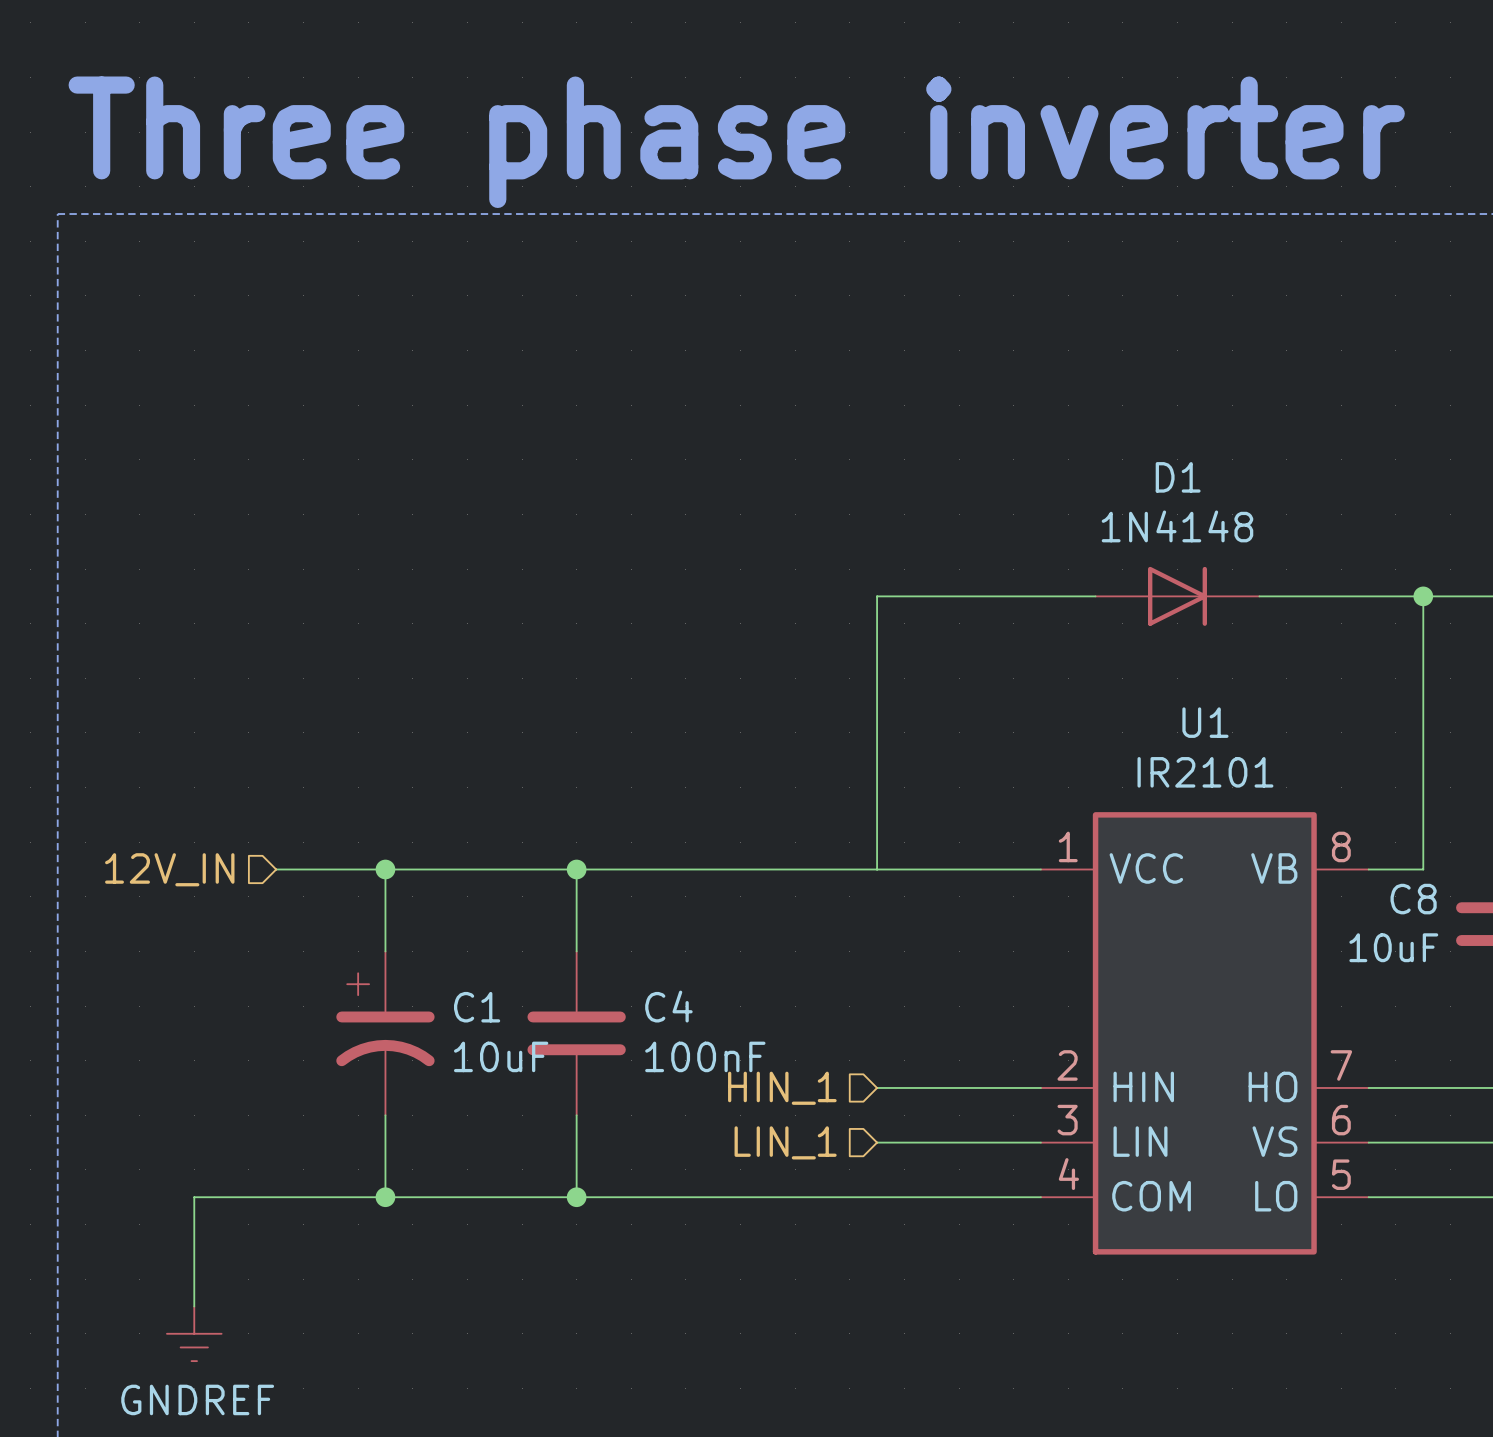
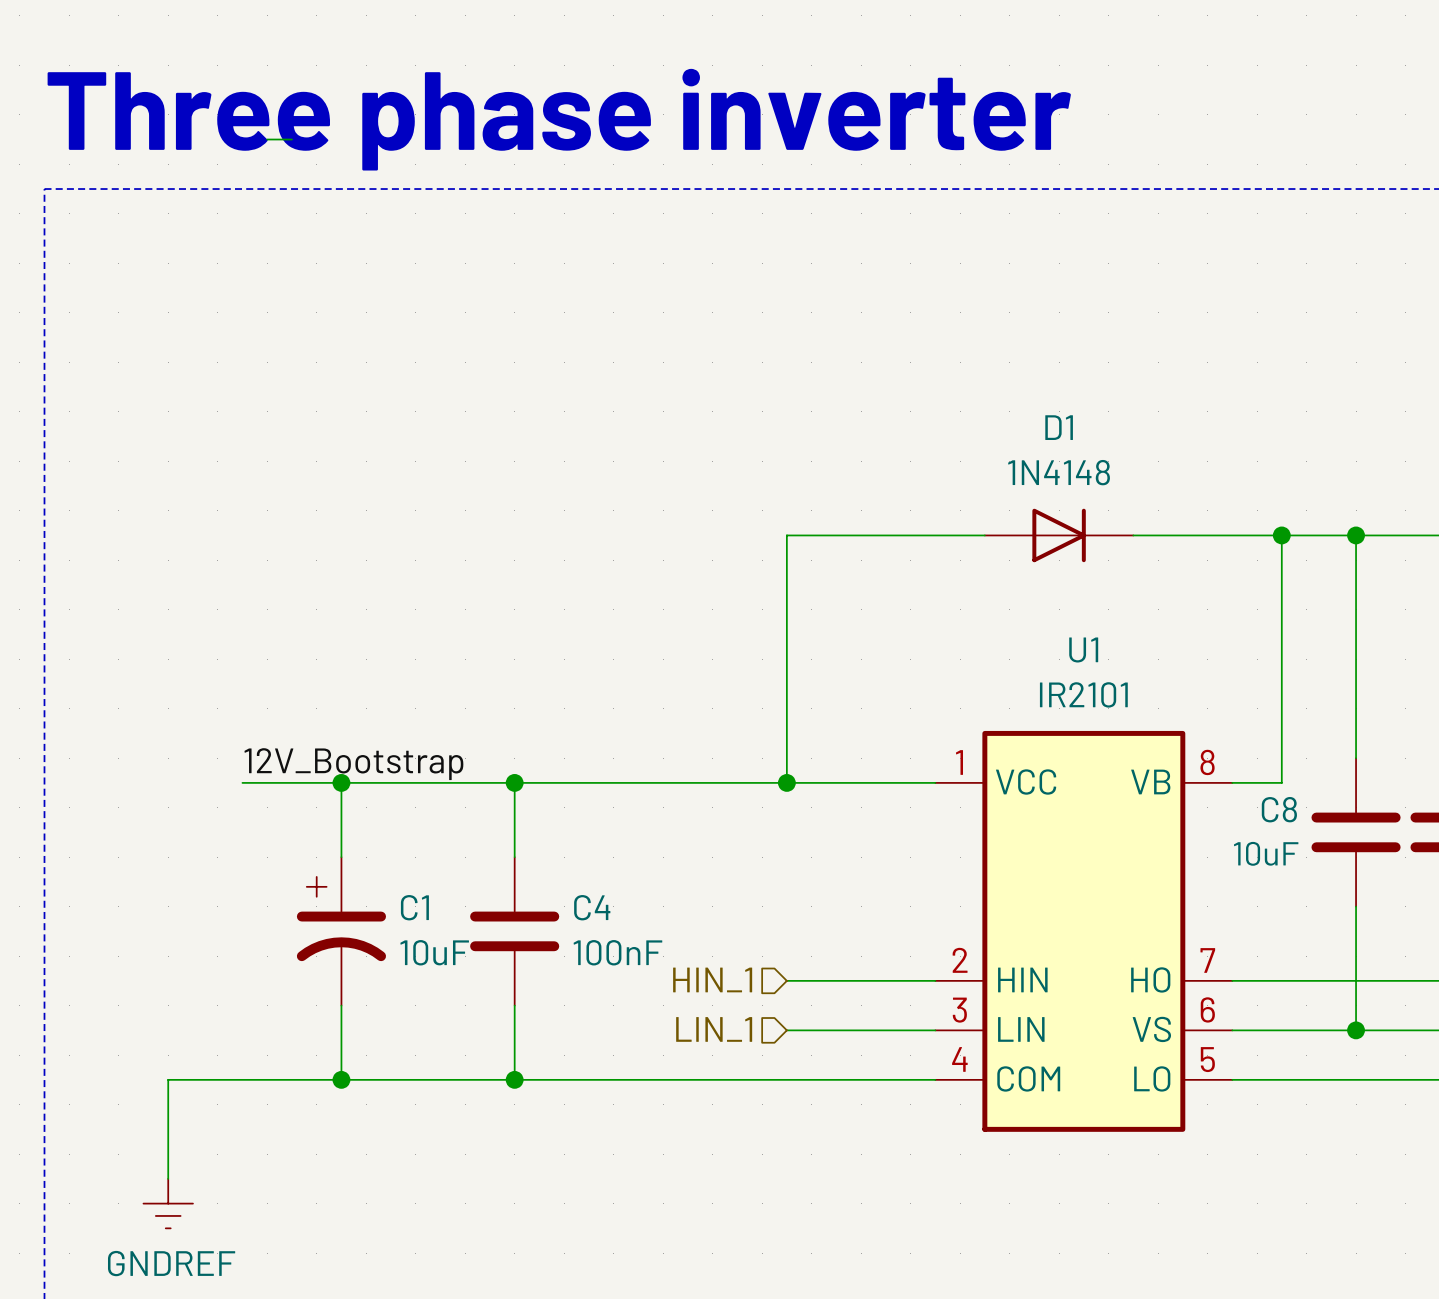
wire: none -> (267, 139) (291, 139)
label: none -> 12V_Bootstrap (353, 764)
hierarchical label: 12V_IN (169, 869) -> none
junction: none -> (786, 782)

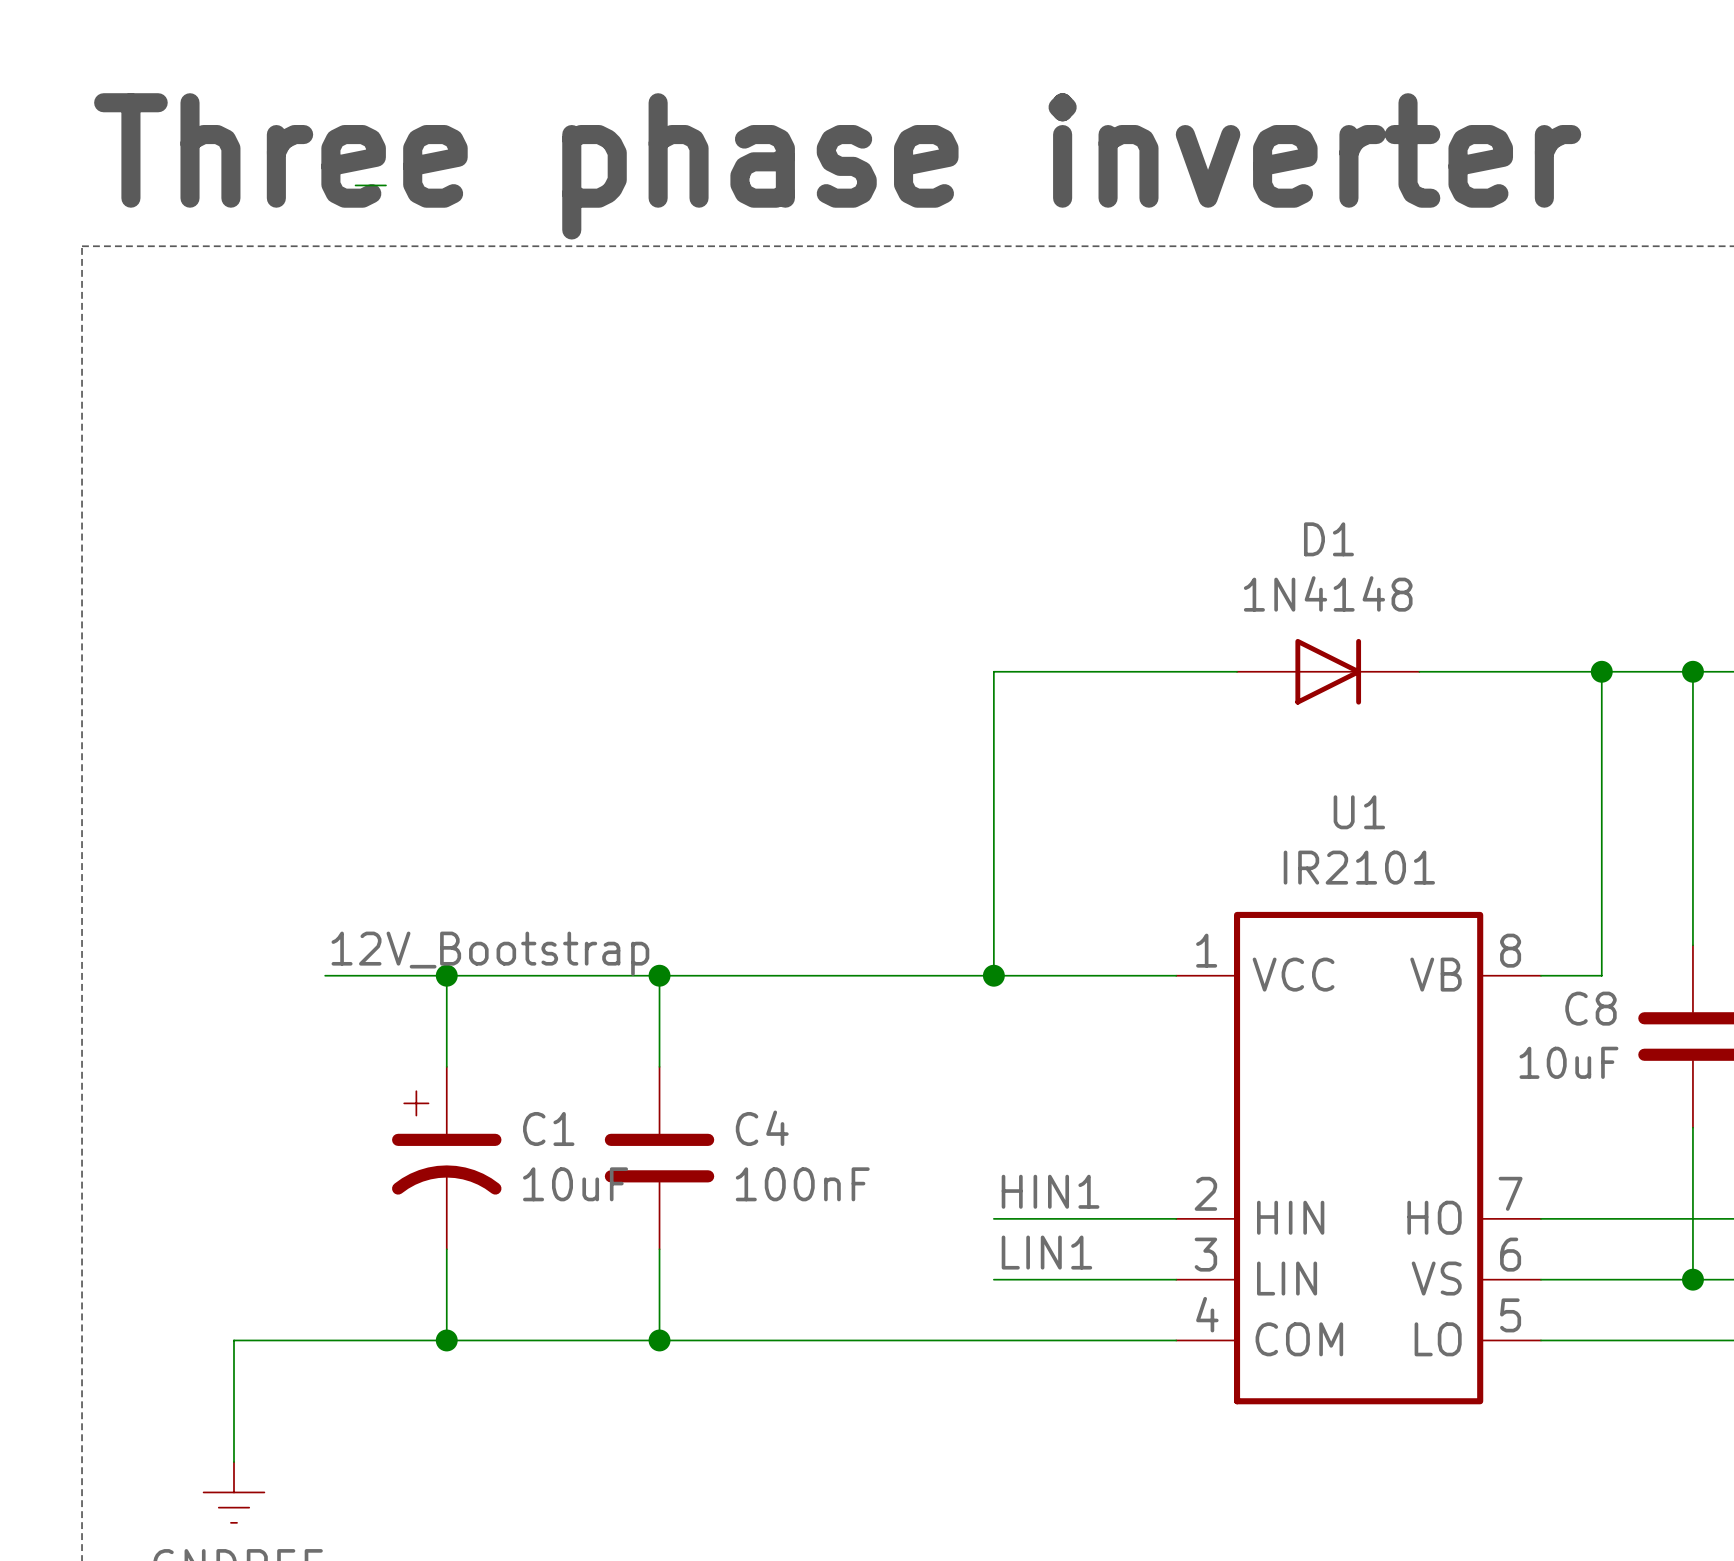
label: none -> HIN1 (1050, 1191)
hierarchical label: HIN_1 (712, 979) -> none
label: none -> LIN1 (1046, 1252)
hierarchical label: LIN_1 (714, 1029) -> none

